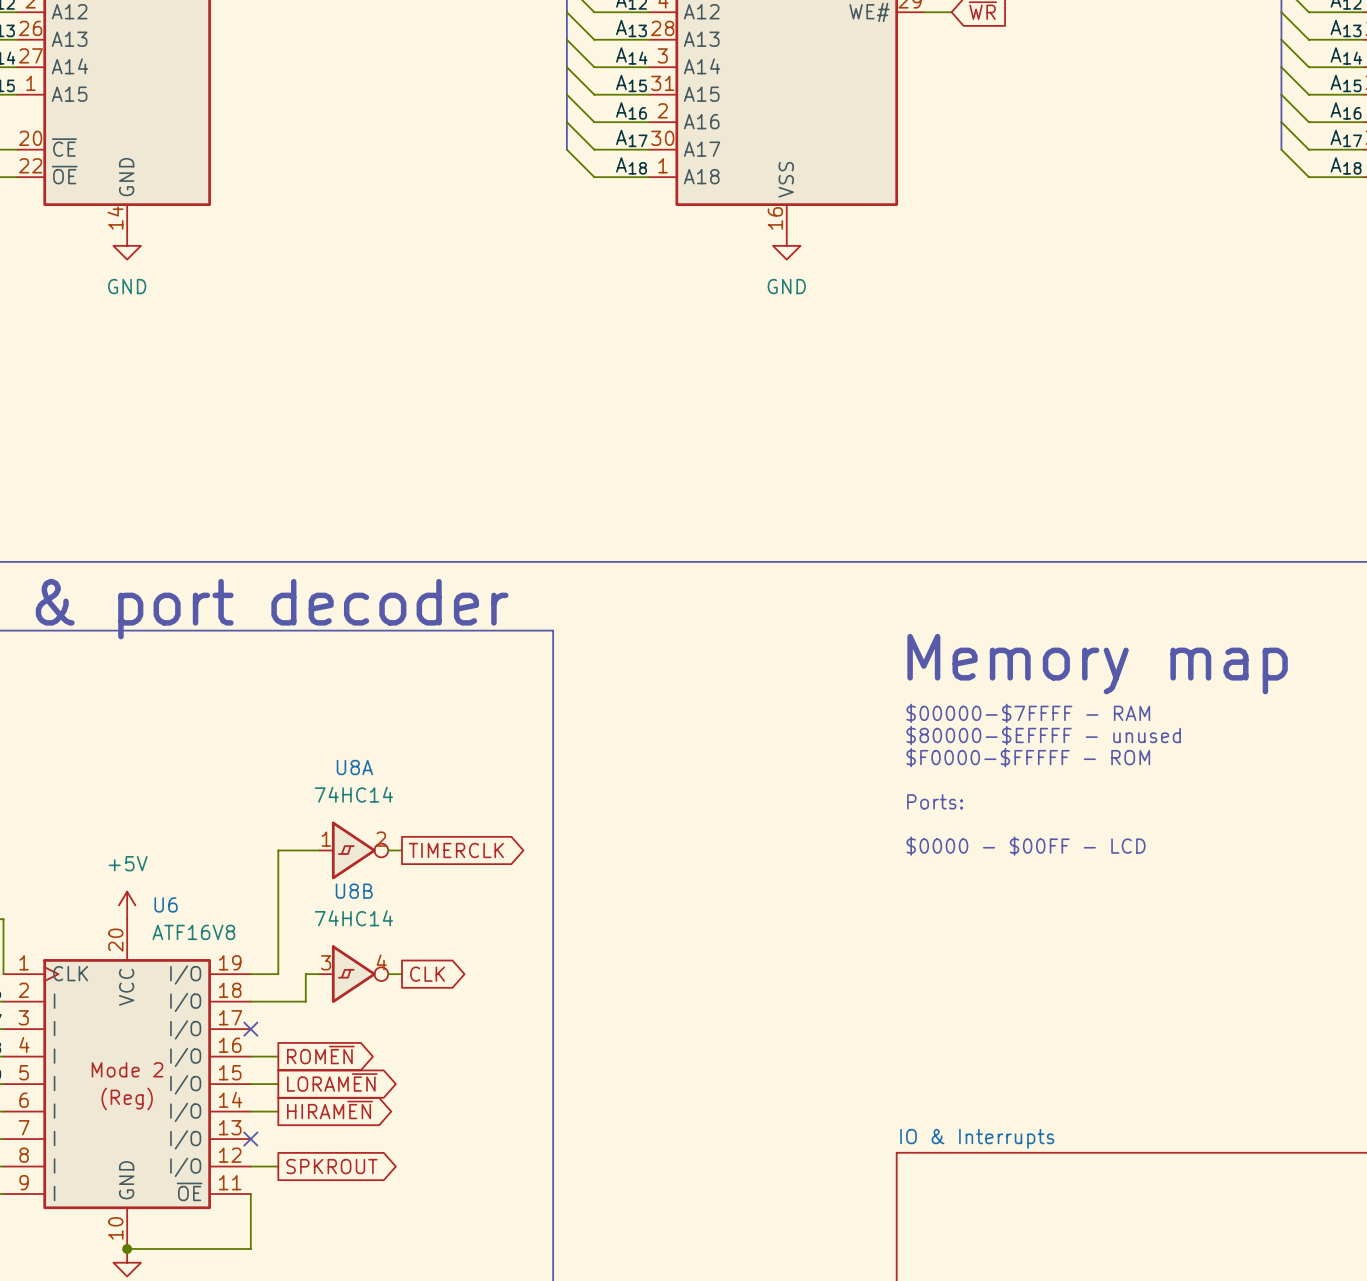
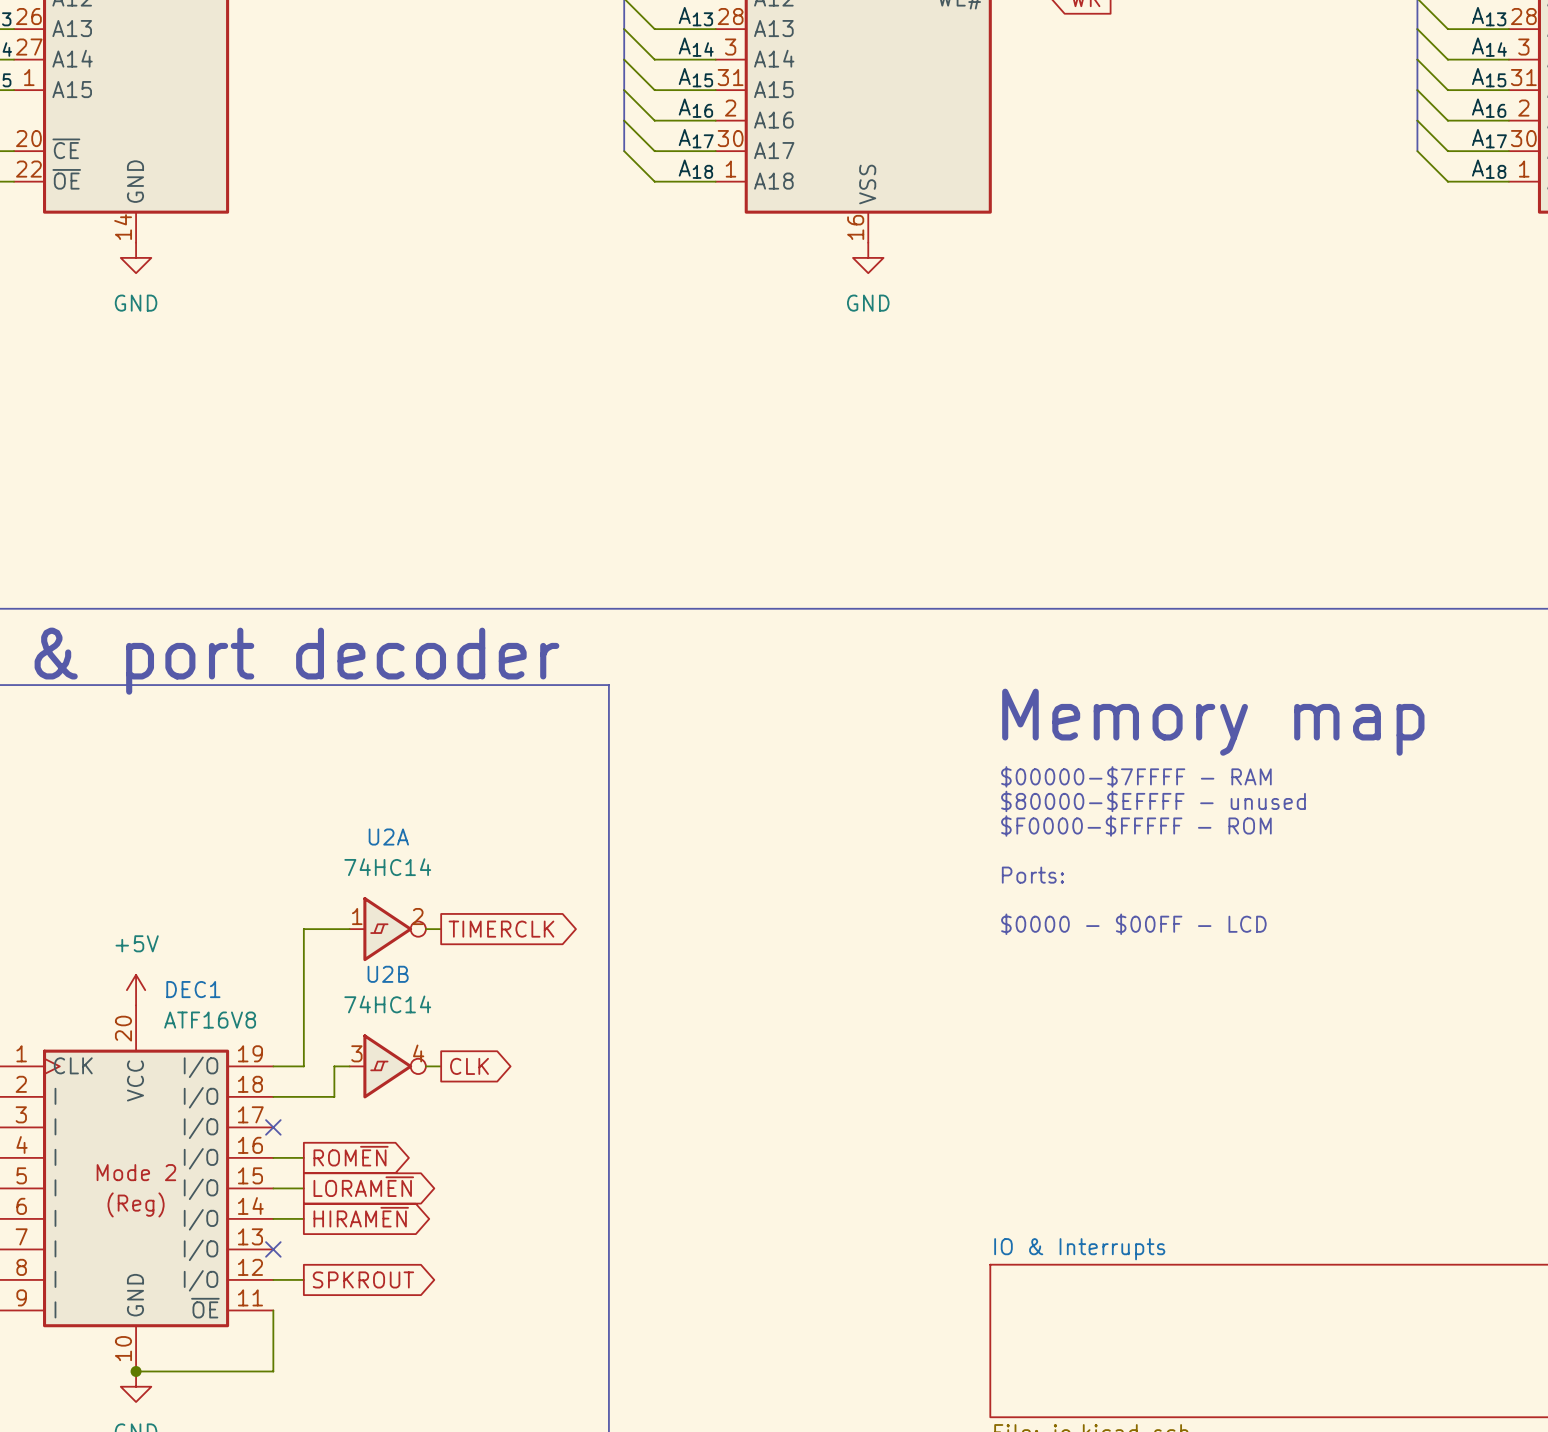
U8A name: U8A (354, 767) -> U2A (388, 837)
U8B name: U8B (354, 891) -> U2B (388, 974)
U6 name: U6 (166, 904) -> DEC1 (193, 989)

